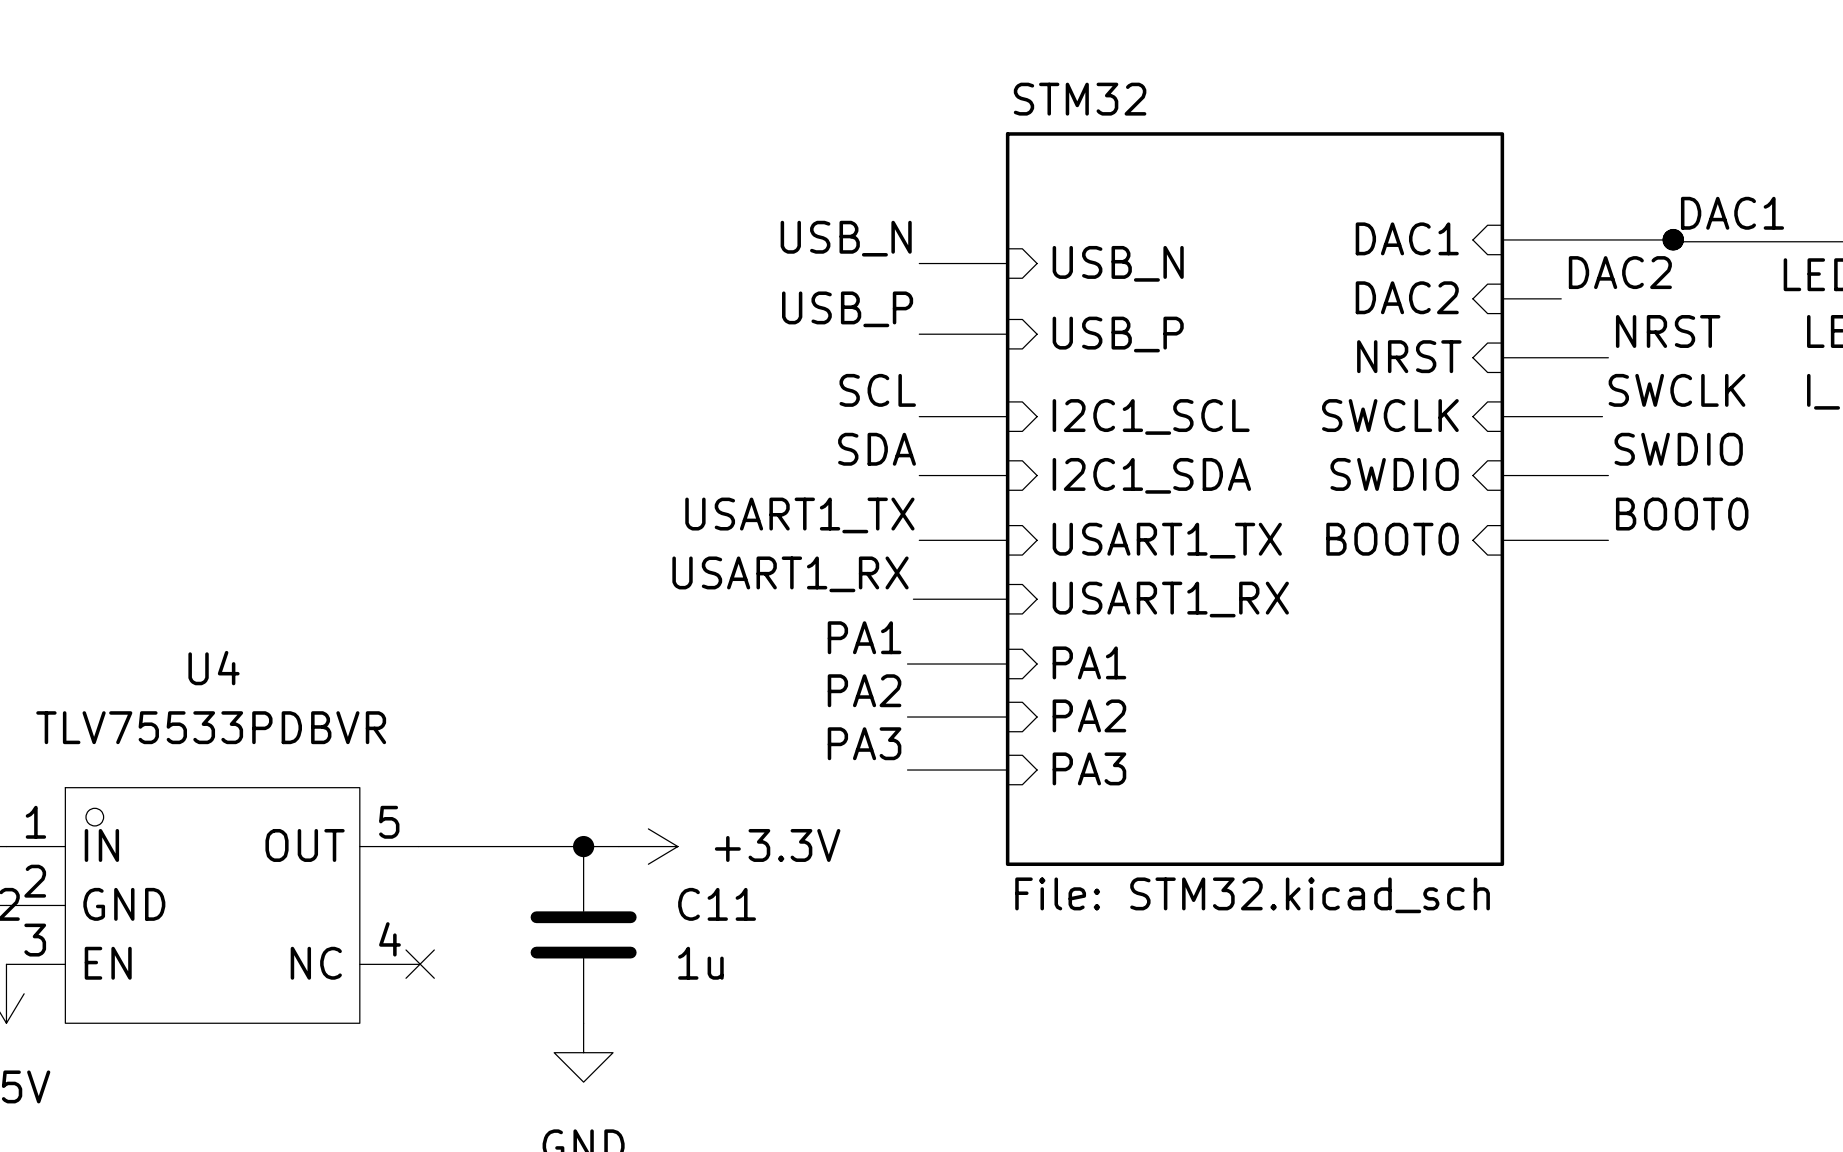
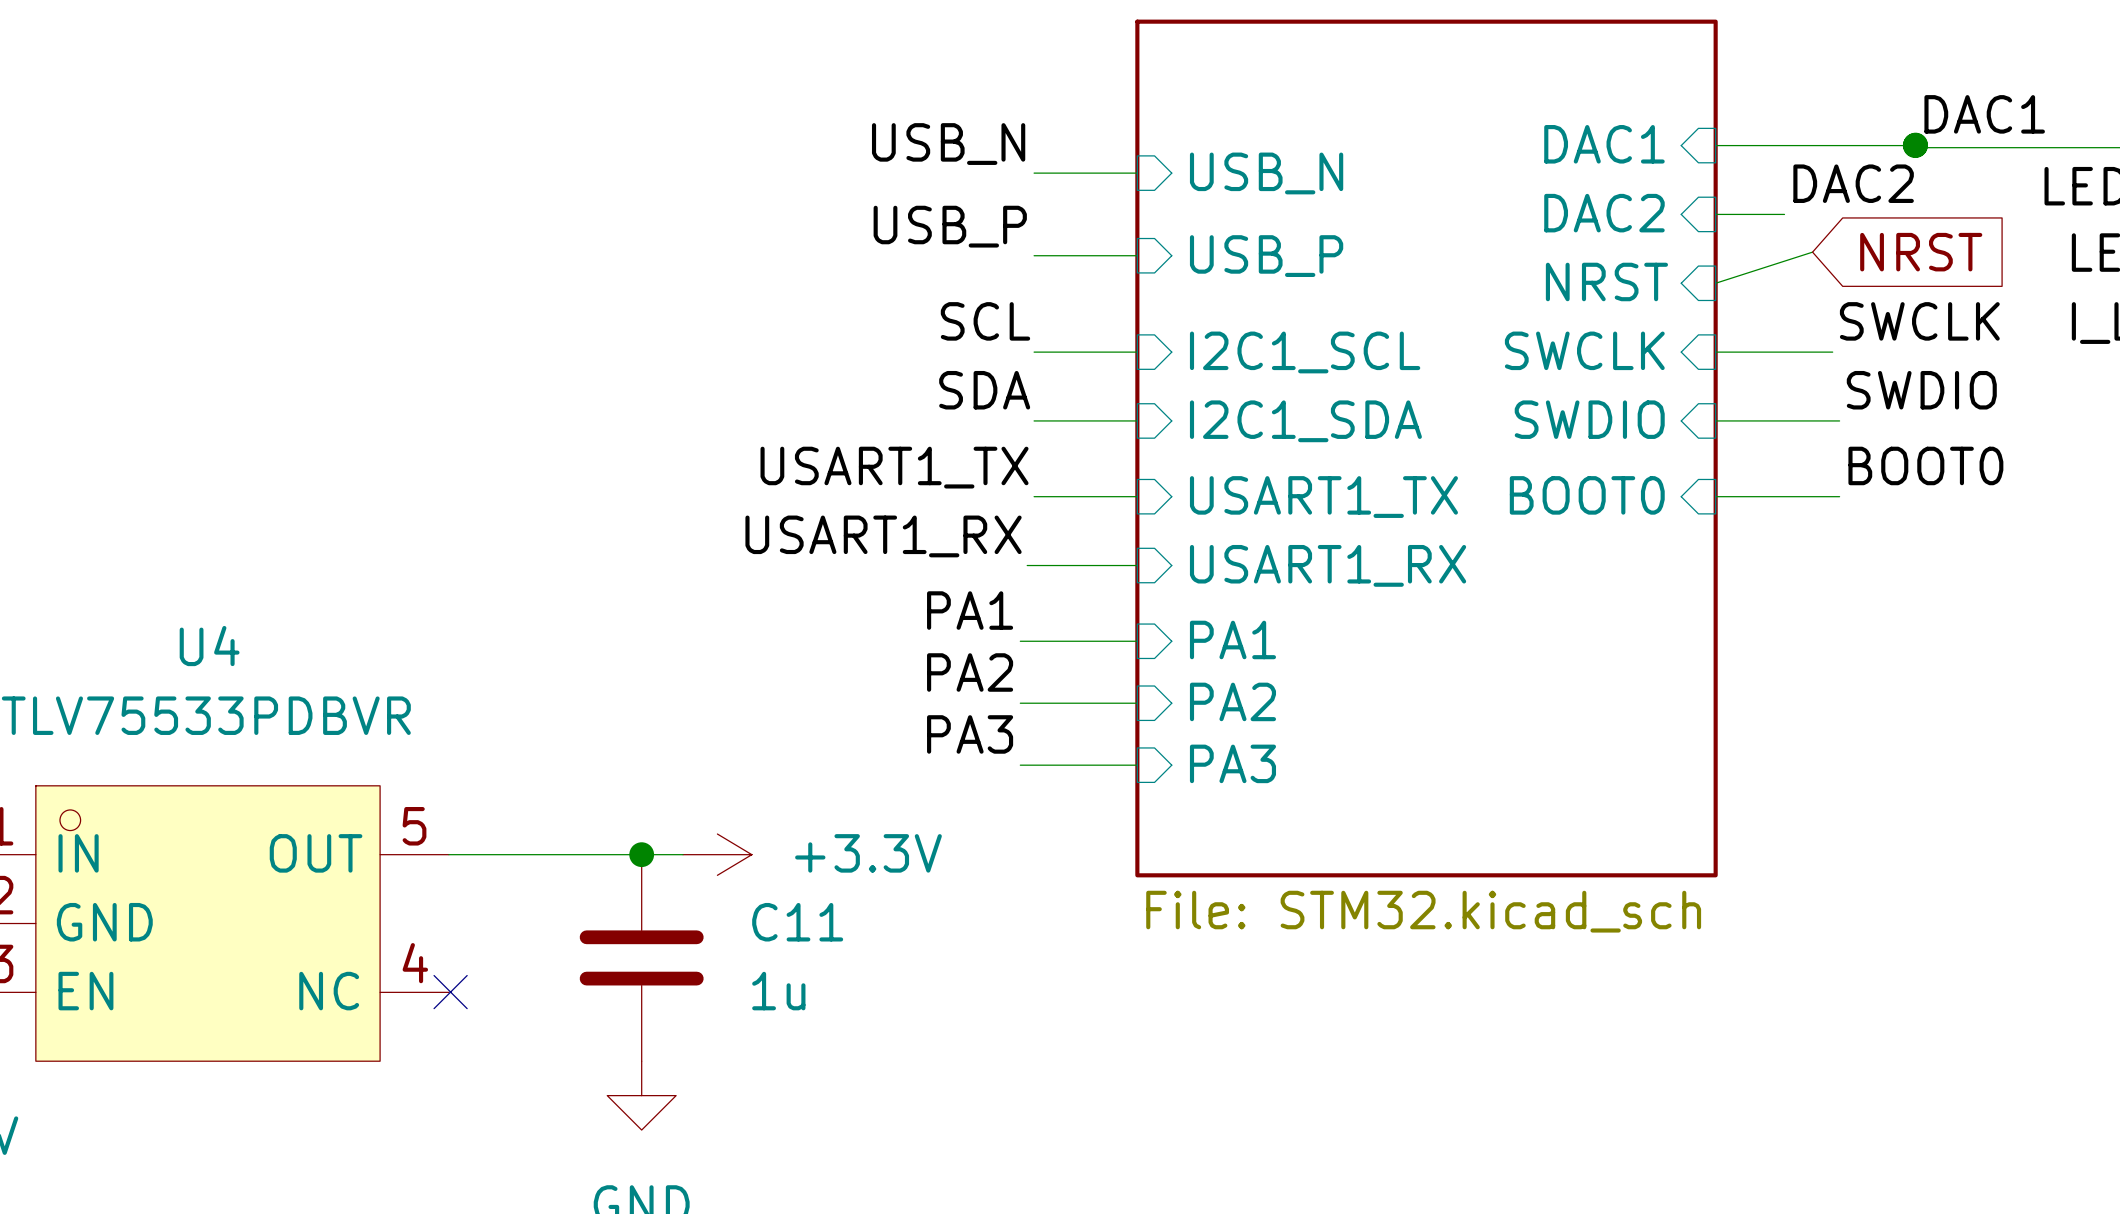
label: NRST (1668, 331) -> none
global label: none -> NRST (1921, 252)
wire: (1502, 357) (1608, 357) -> (1715, 283) (1812, 252)

